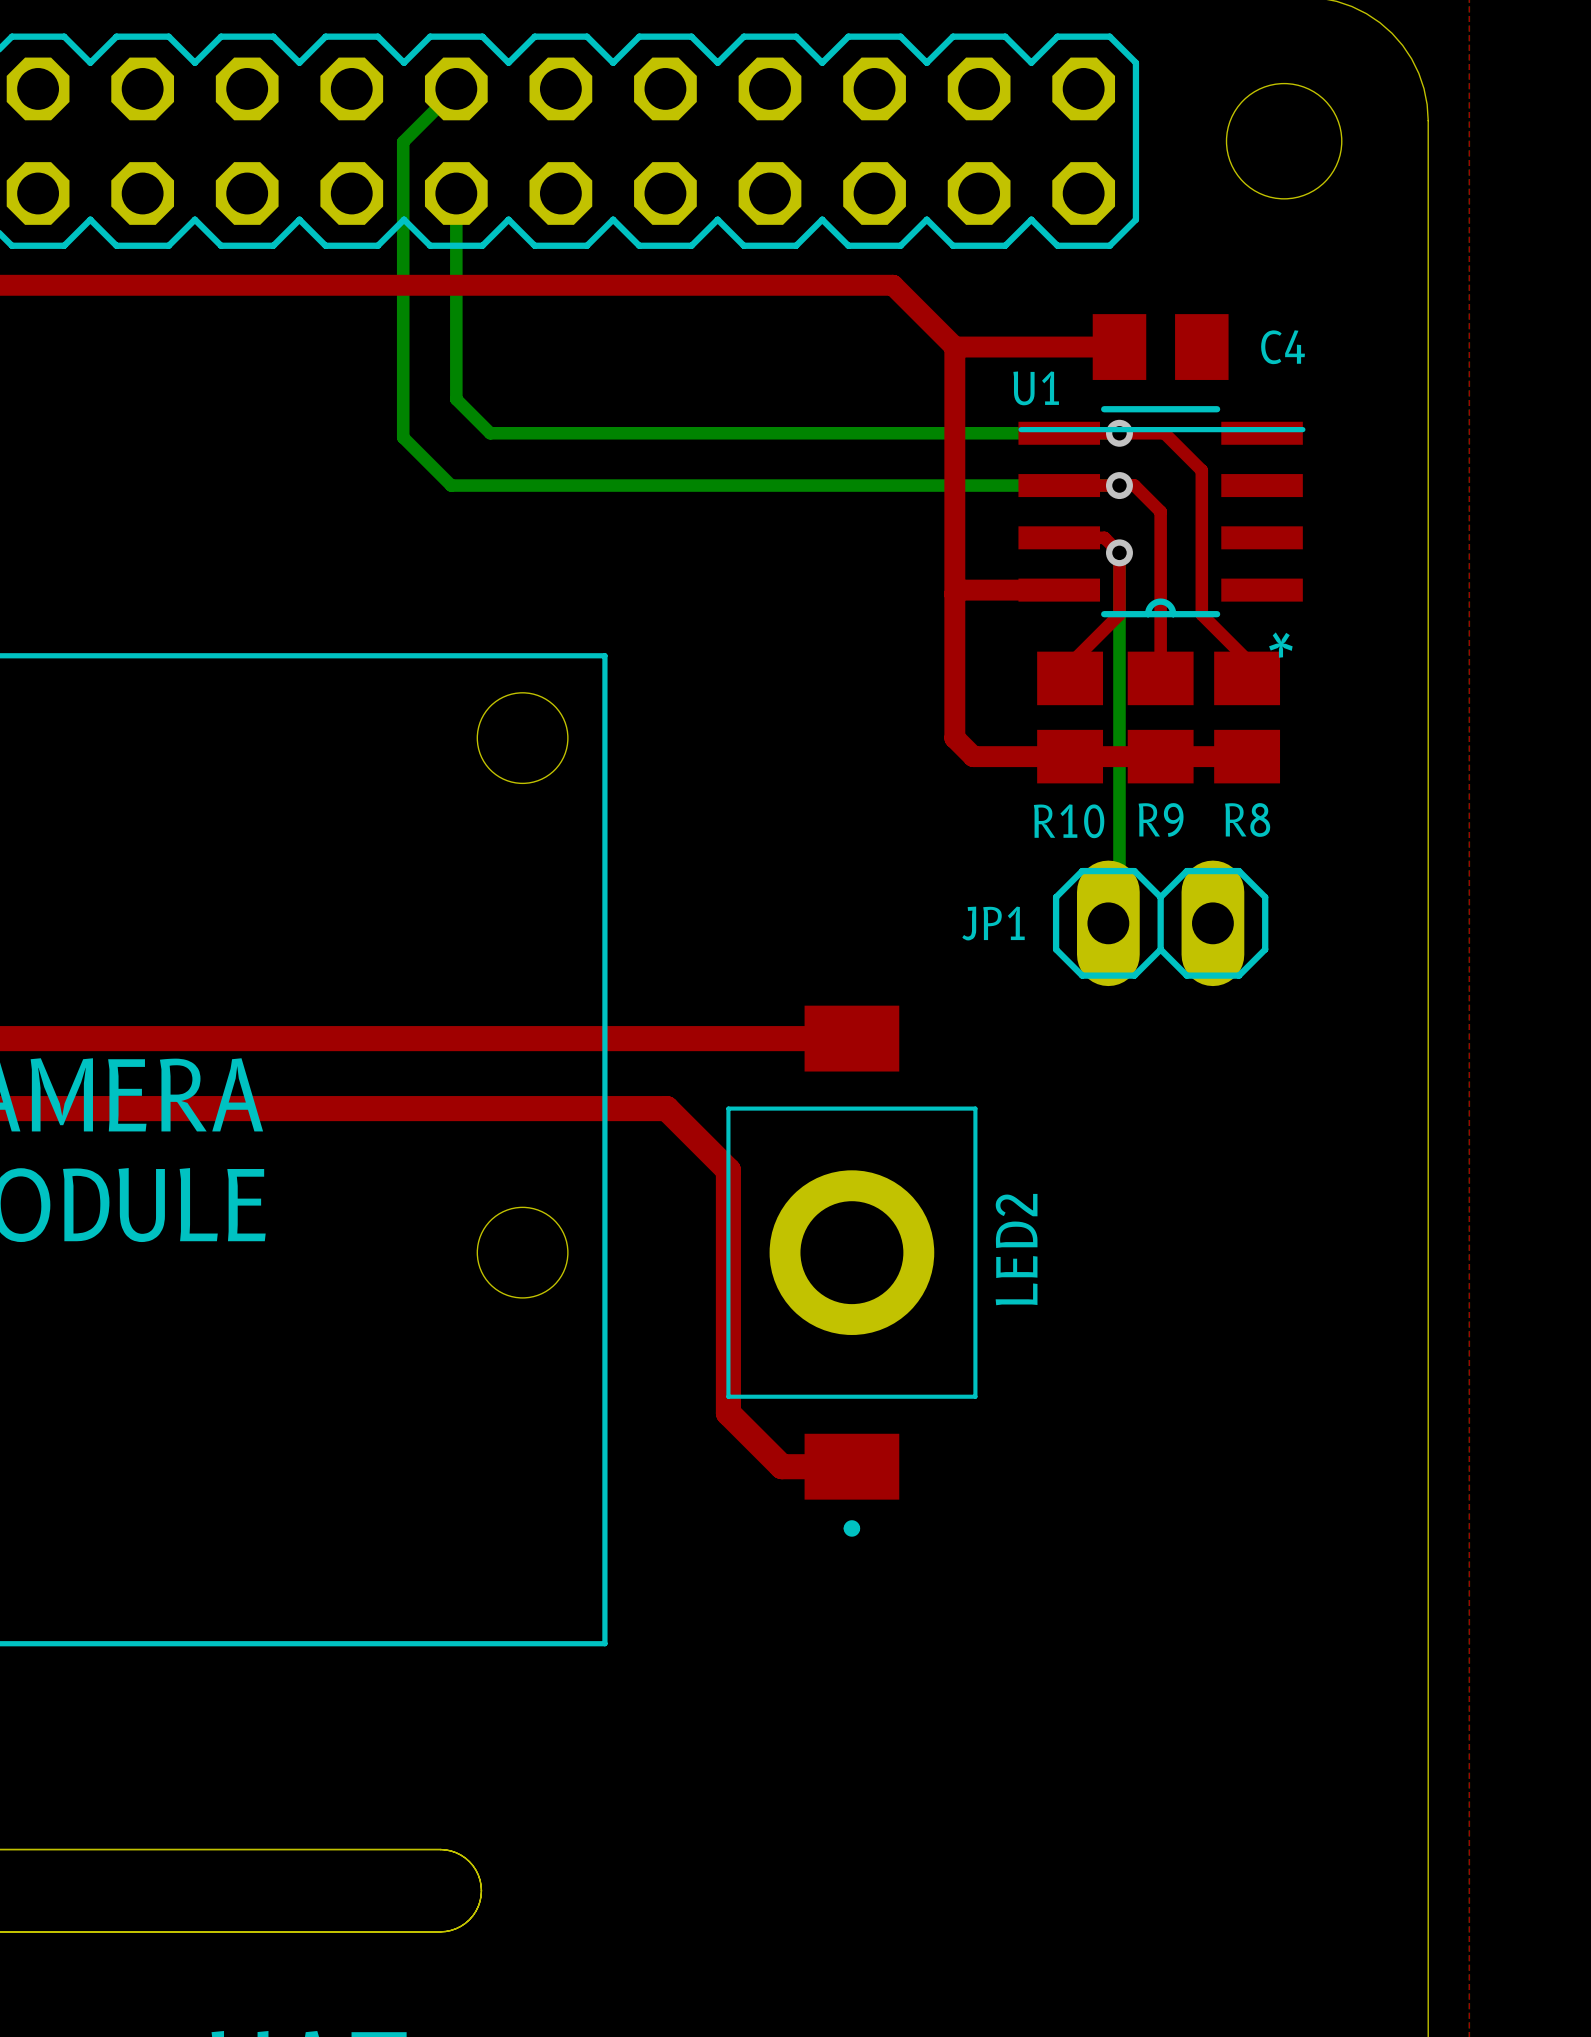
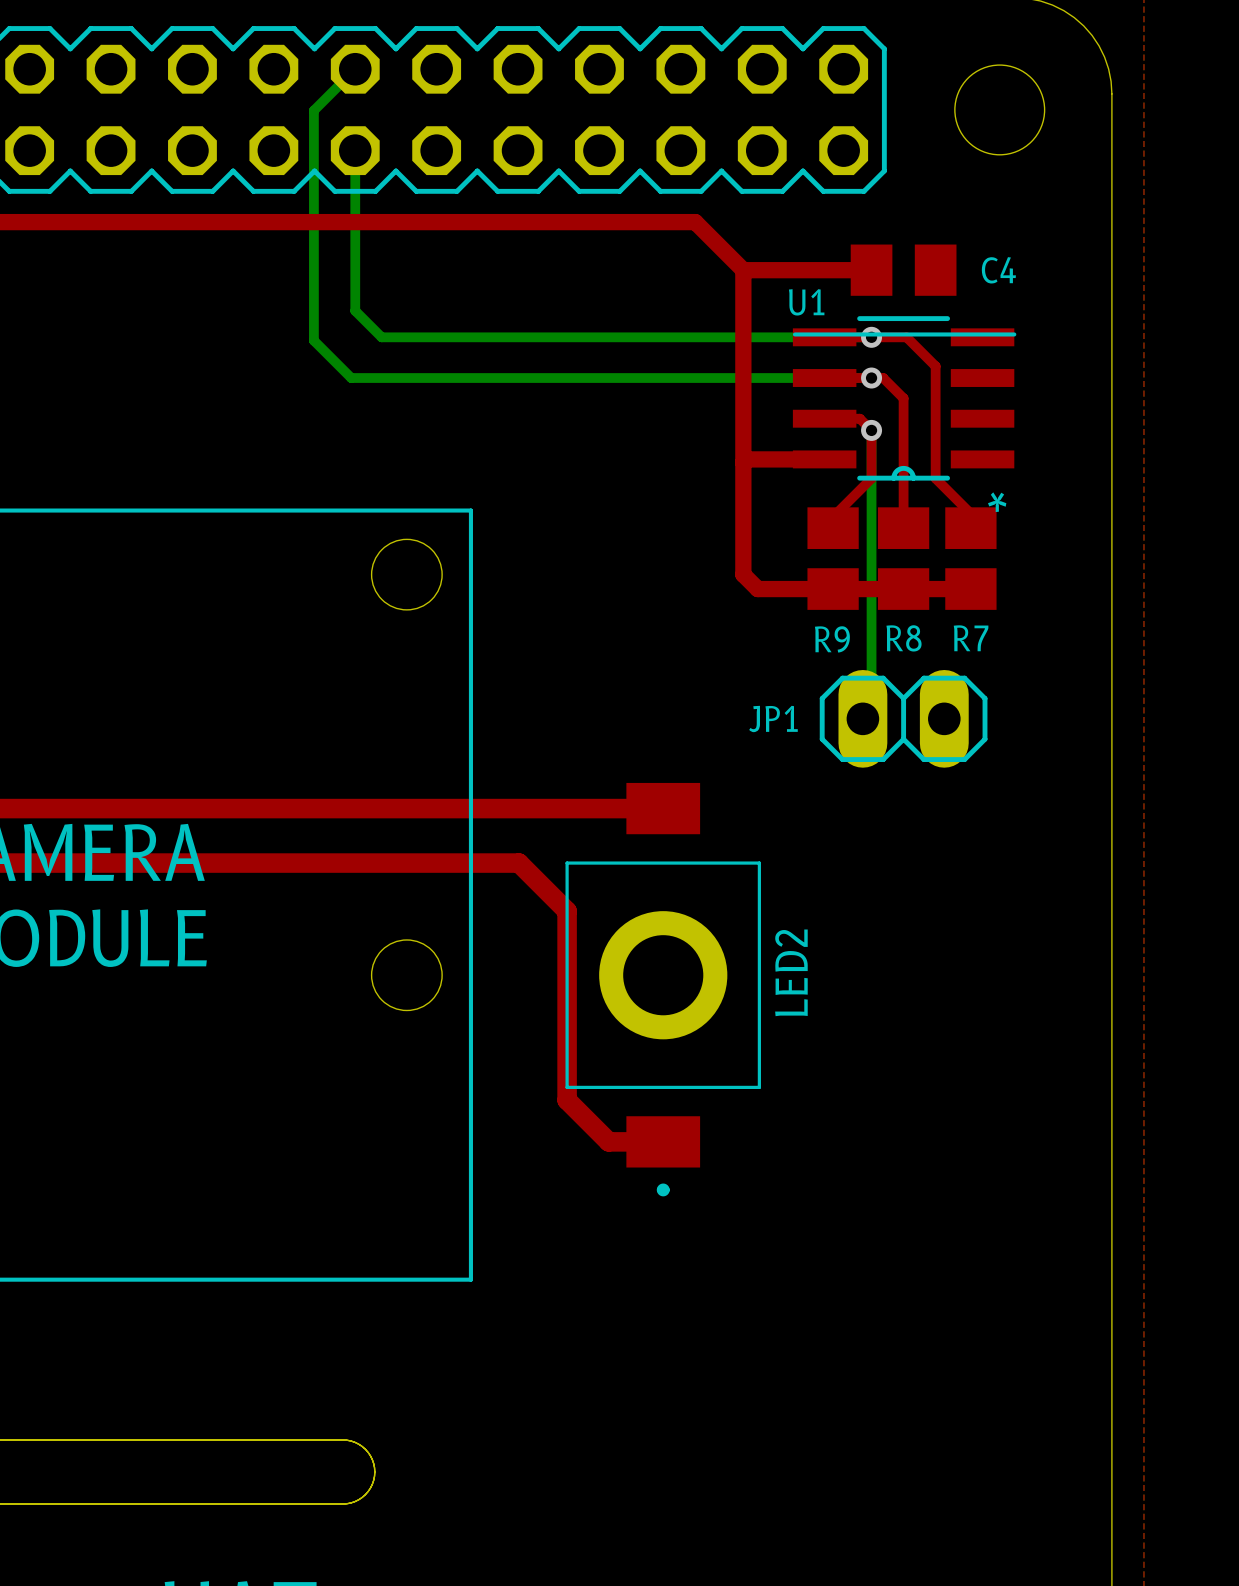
R9 name: R9 (1161, 819) -> R8 (904, 638)
R8 name: R8 (1247, 819) -> R7 (971, 638)
R10 name: R10 (1069, 821) -> R9 (832, 639)

